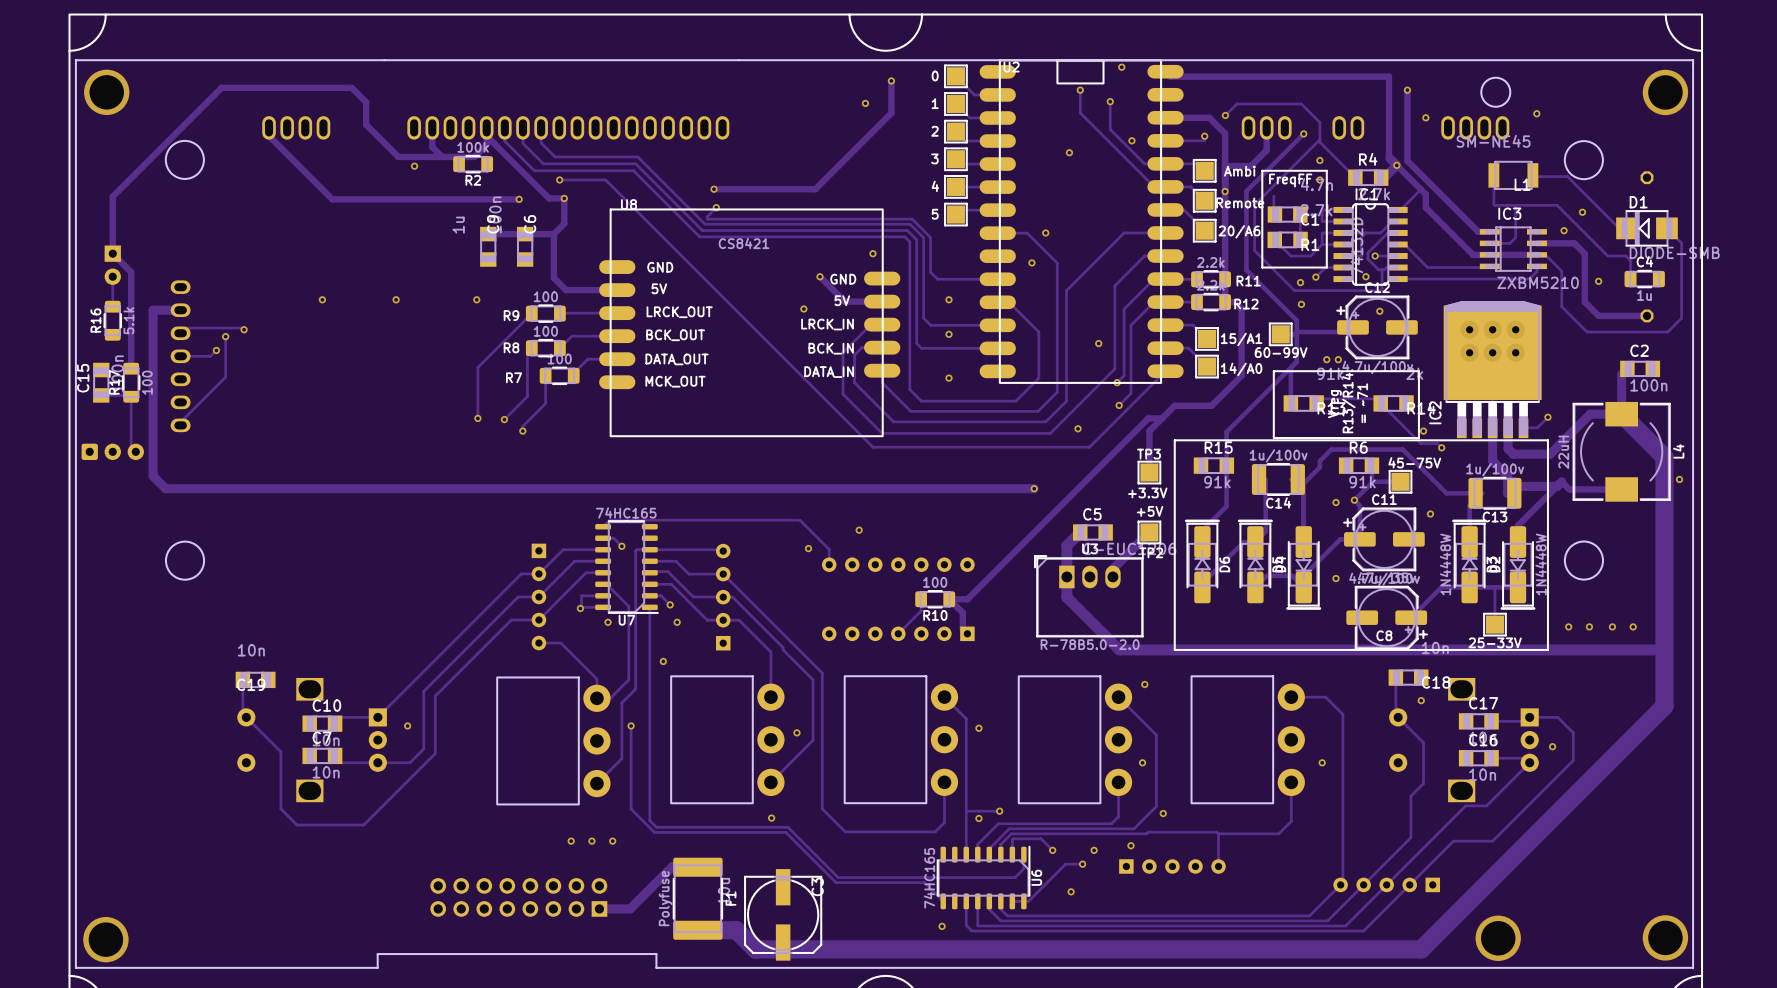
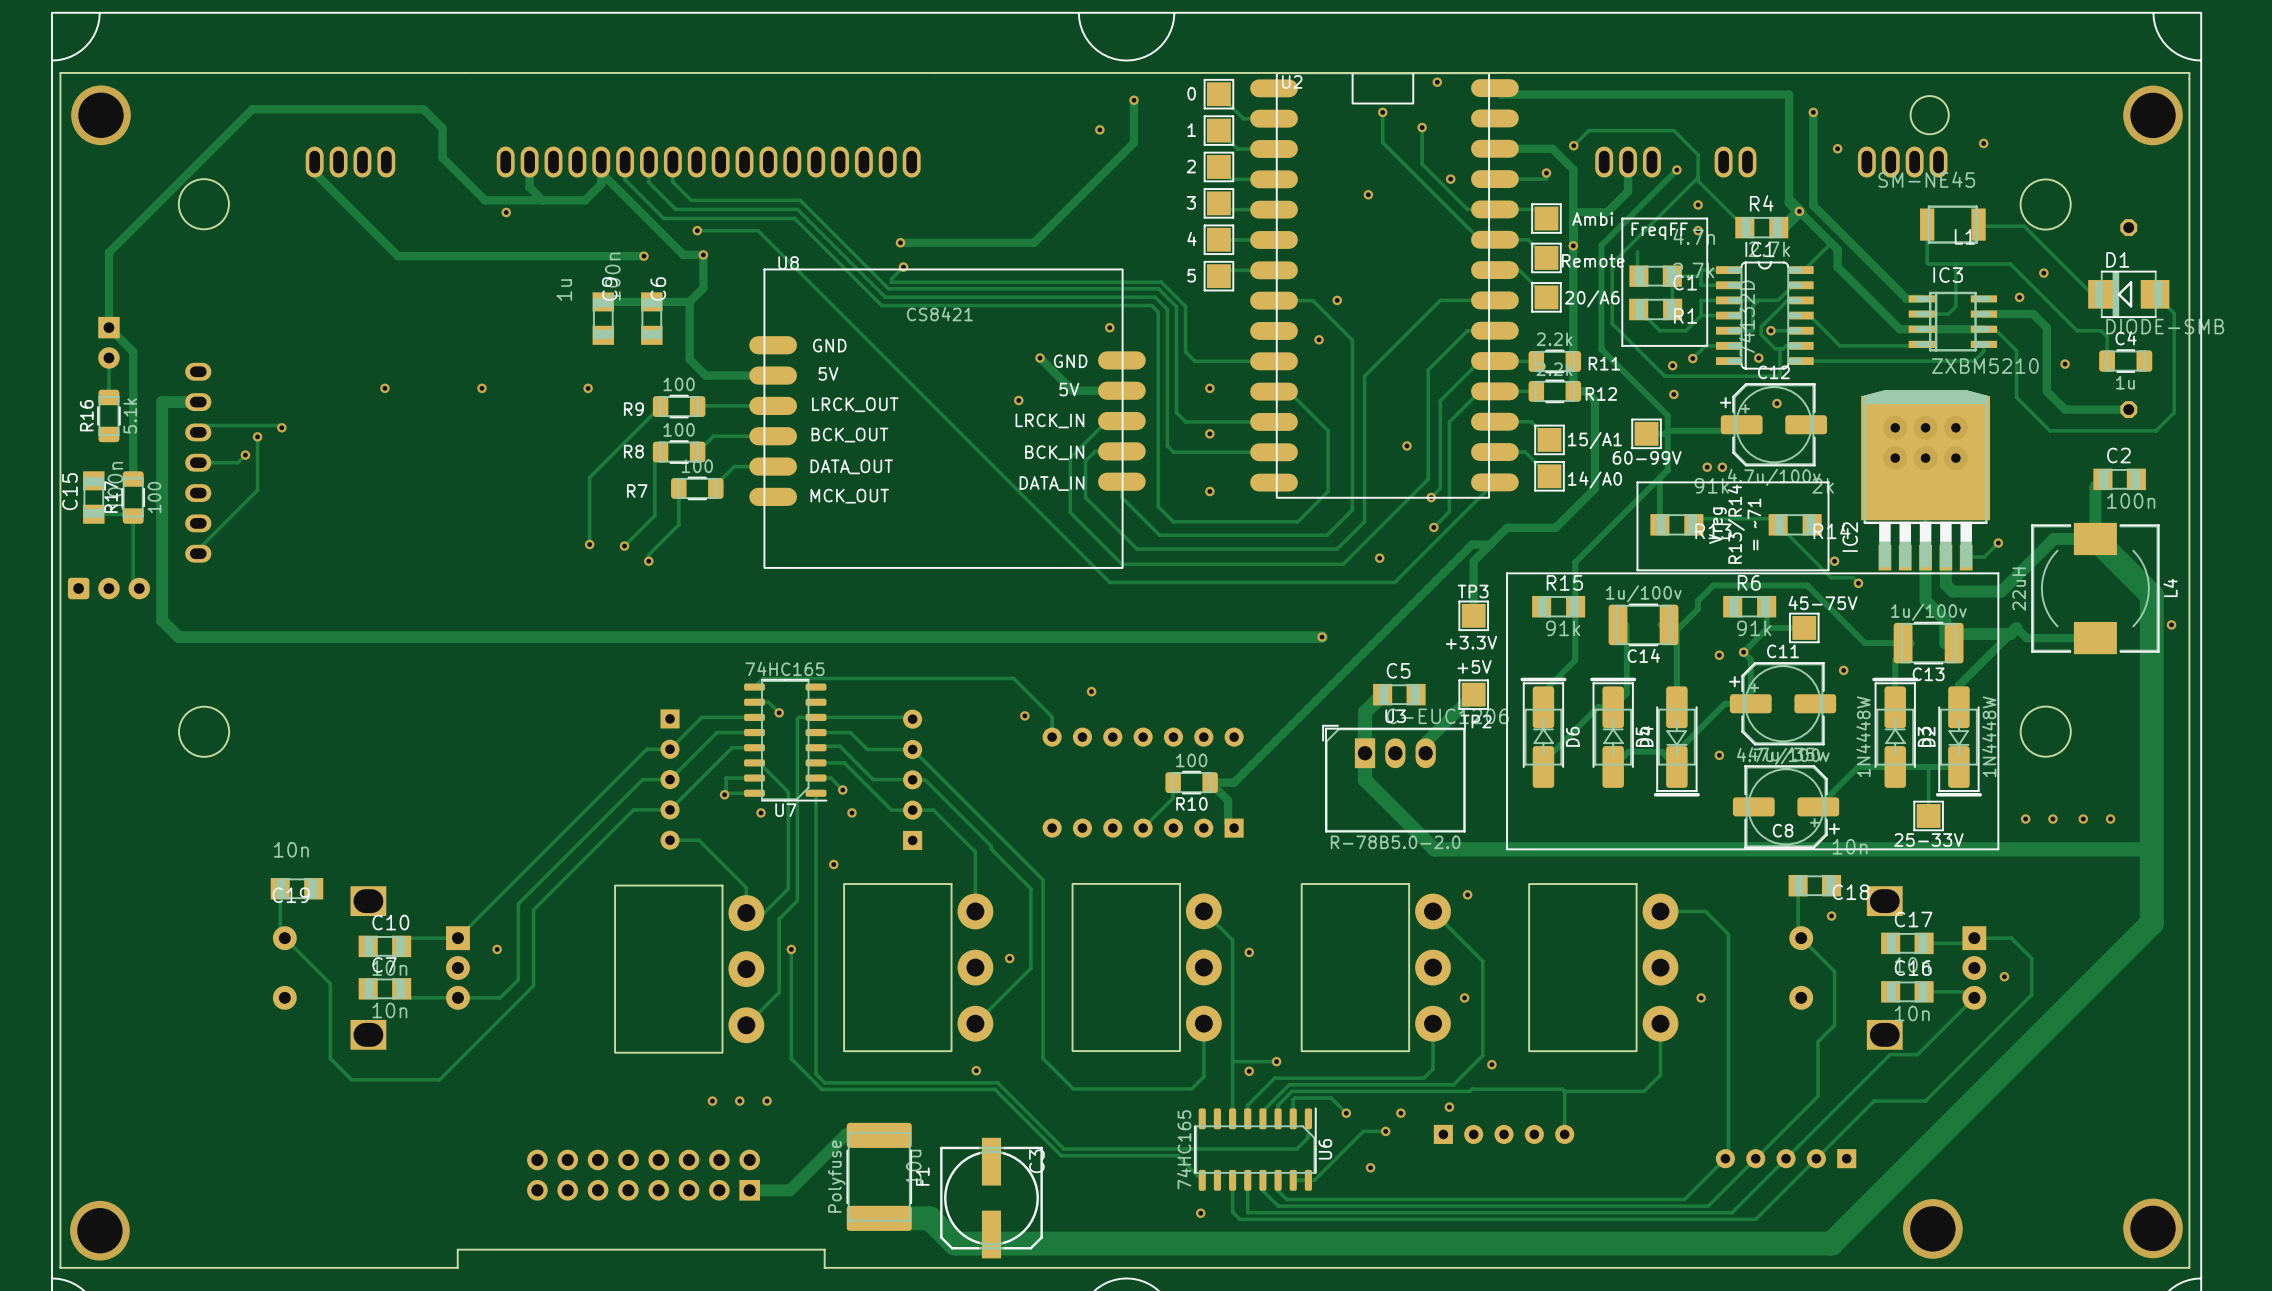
R2: 100k (473, 164) -> none

